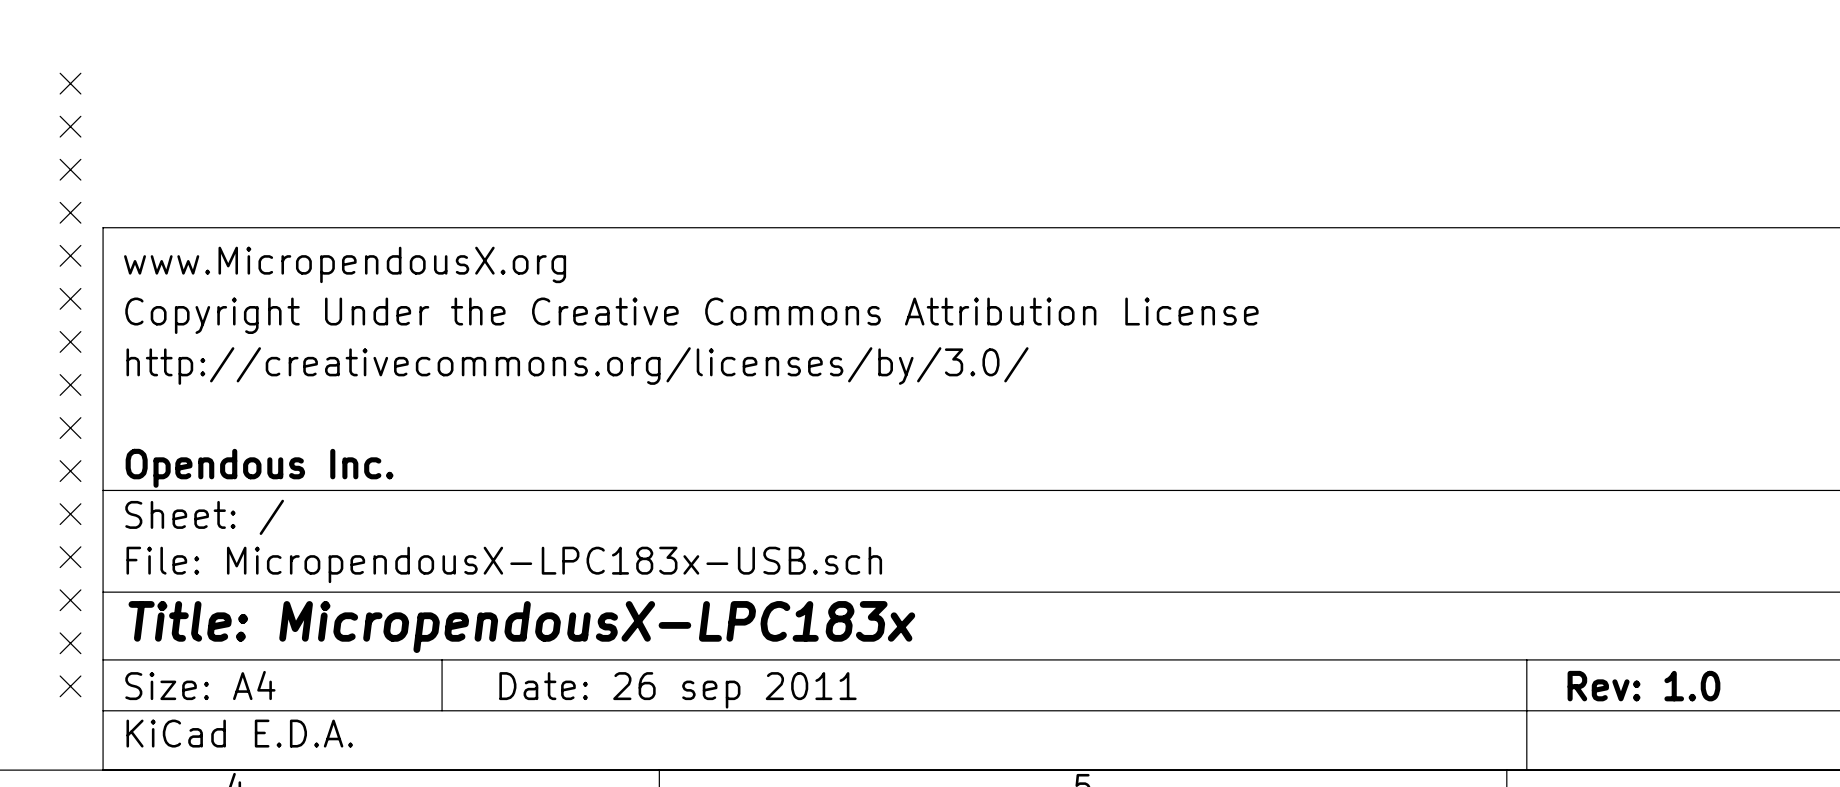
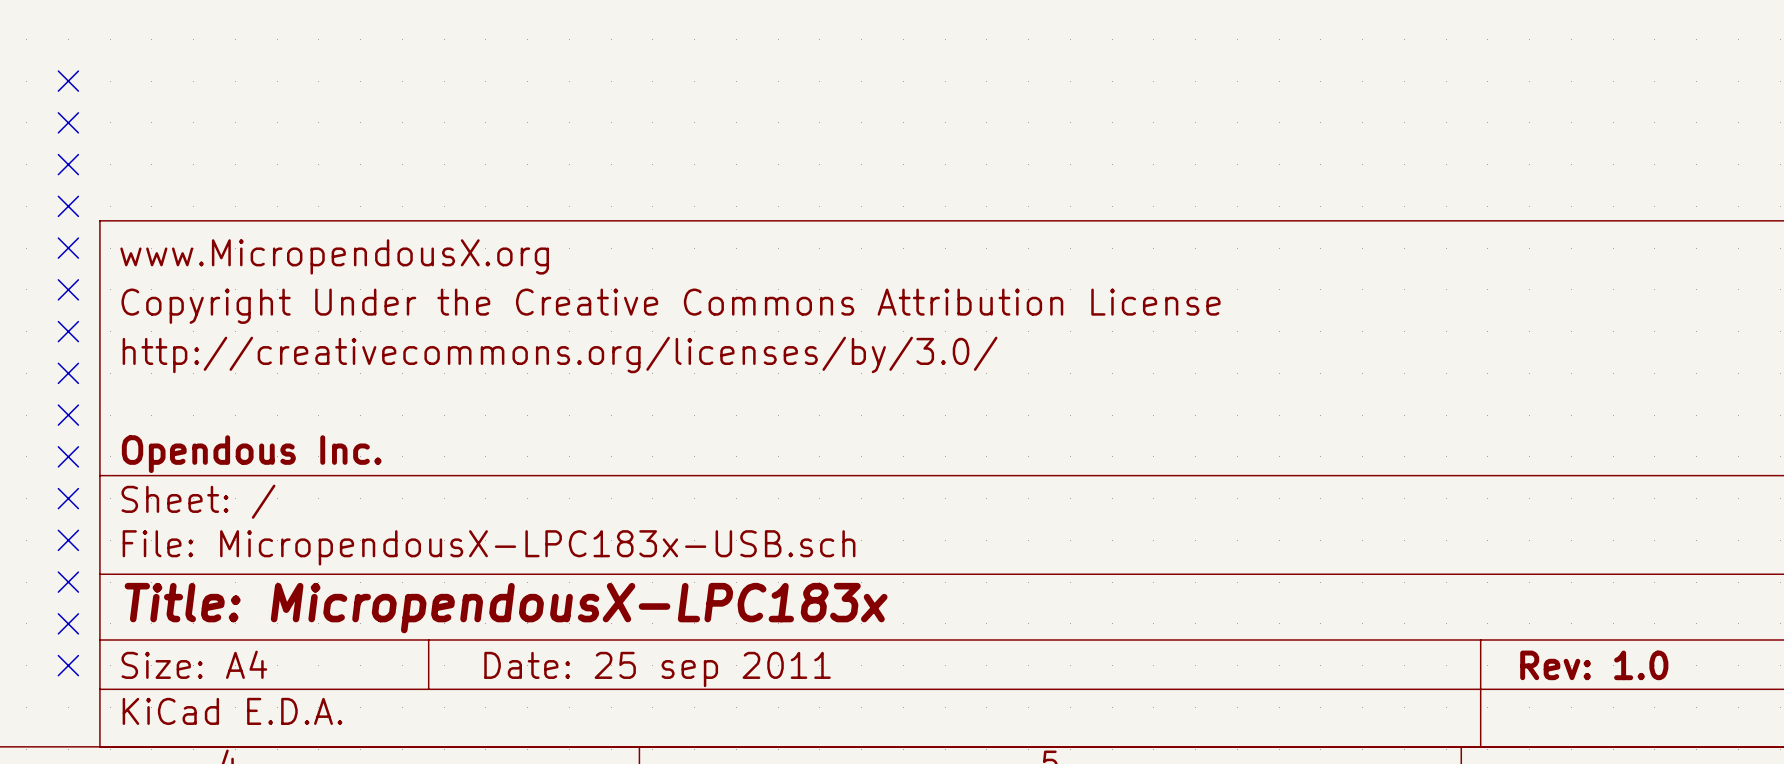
title block: Date: 26 sep 2011 (678, 690) -> Date: 25 sep 2011 (657, 669)

